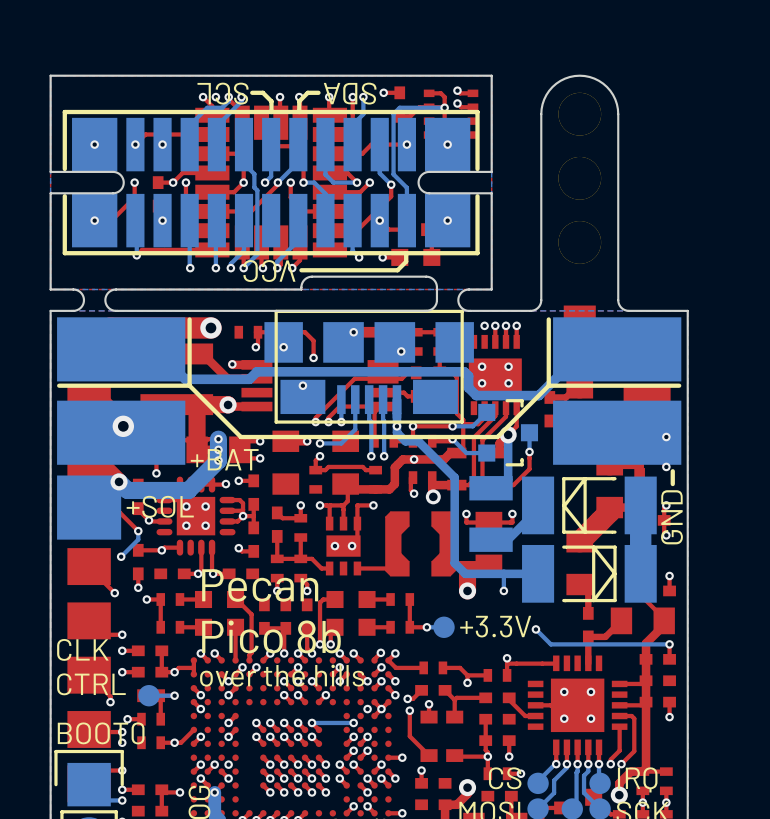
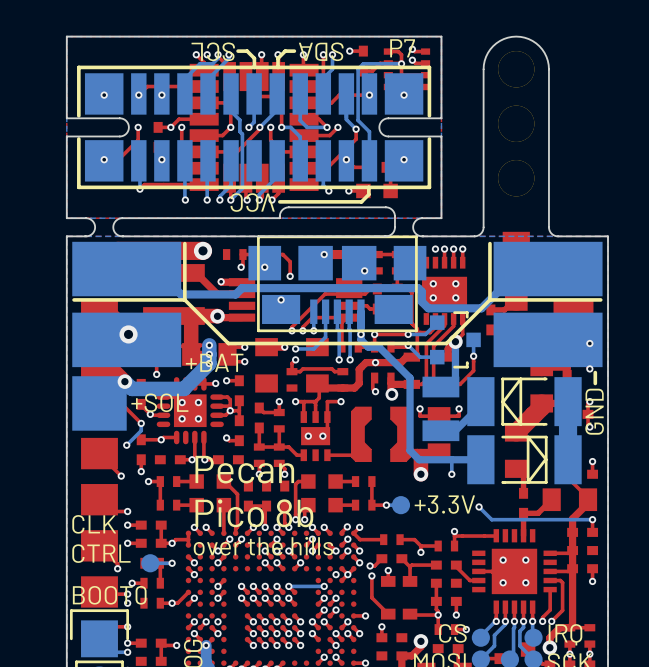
part: (271, 182) -> none
P7: none -> (254, 127)

